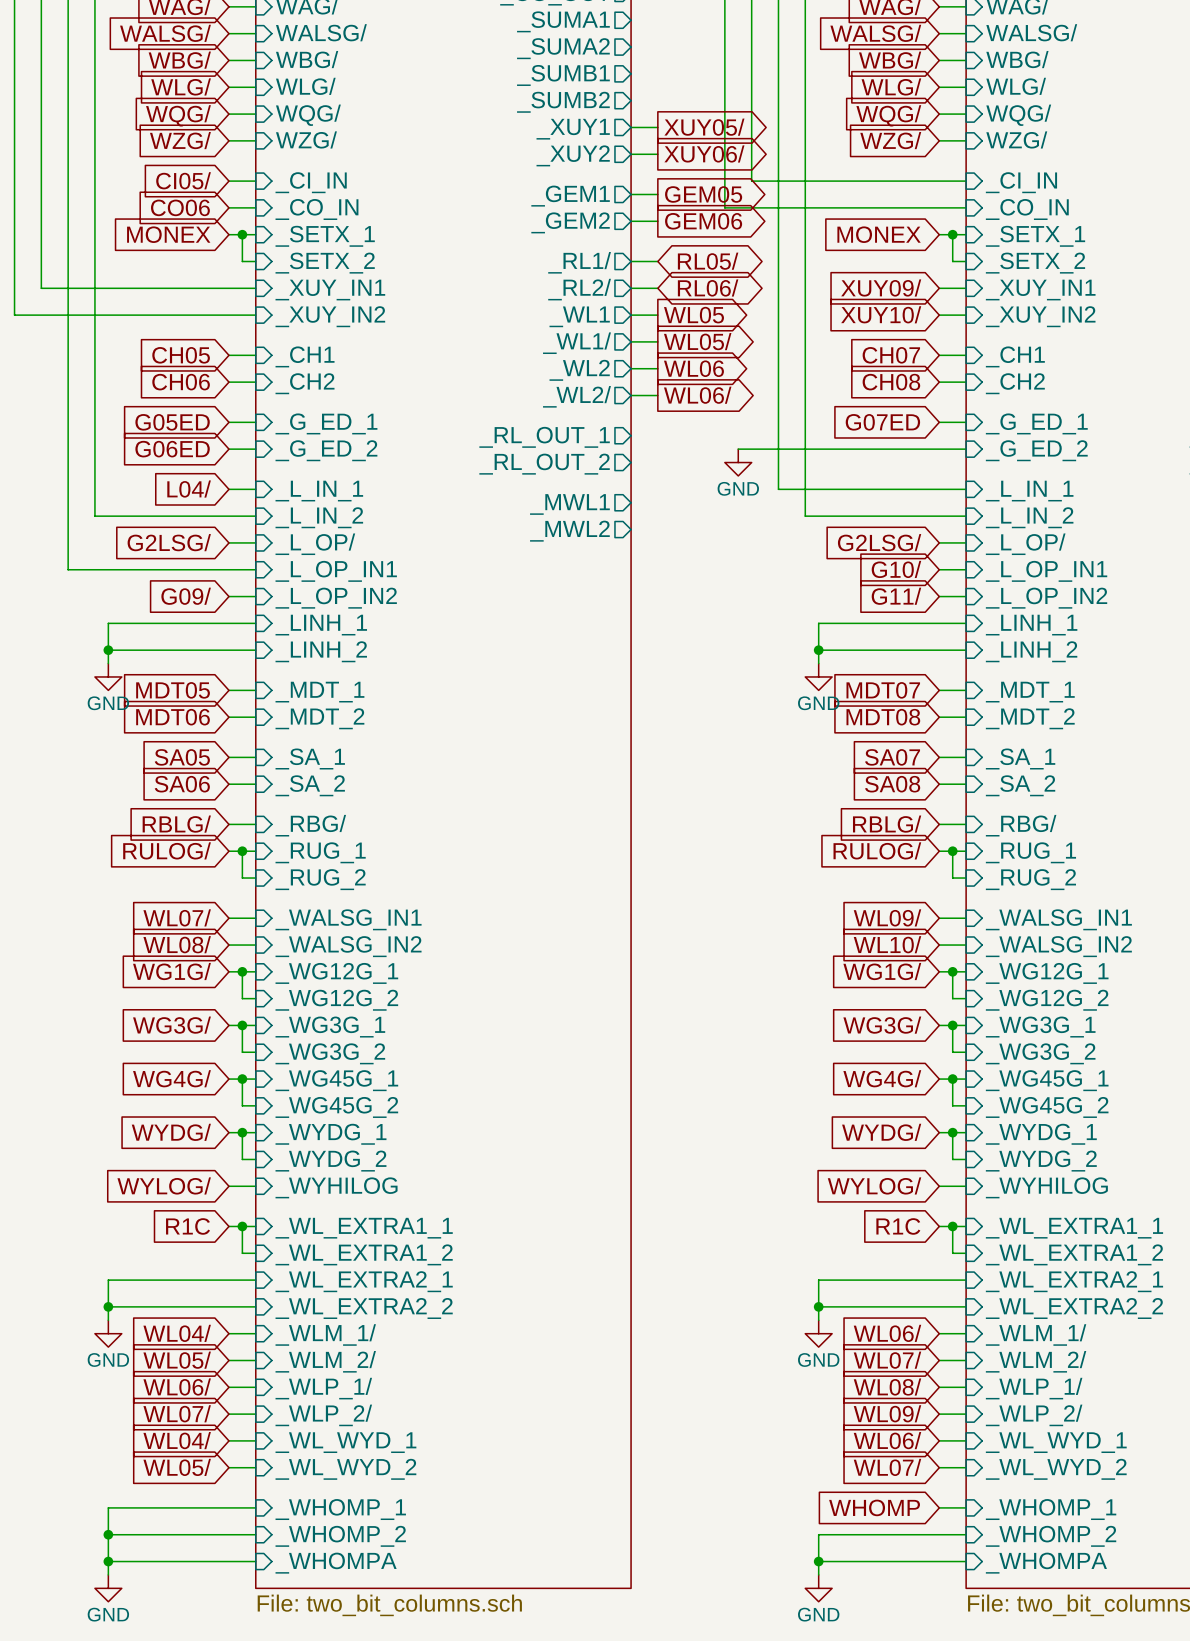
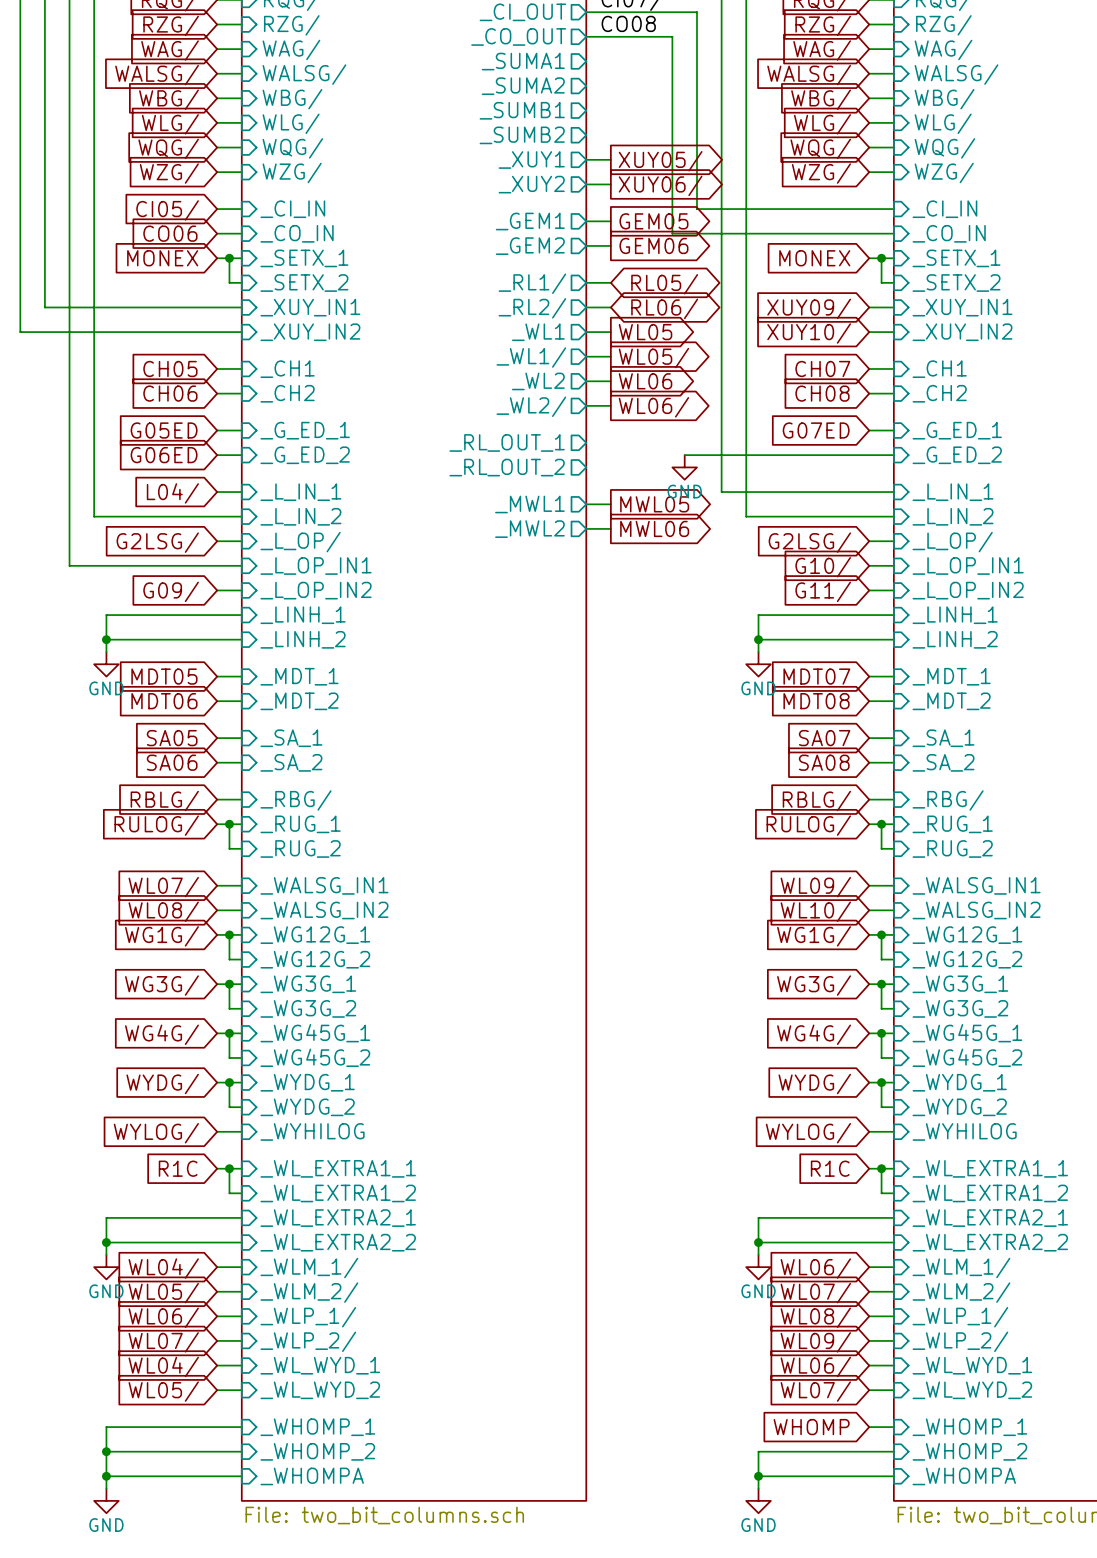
wire: none -> (586, 504) (610, 504)
global label: none -> MWL05 (654, 504)
wire: none -> (586, 528) (610, 528)
global label: none -> MWL06 (654, 528)

